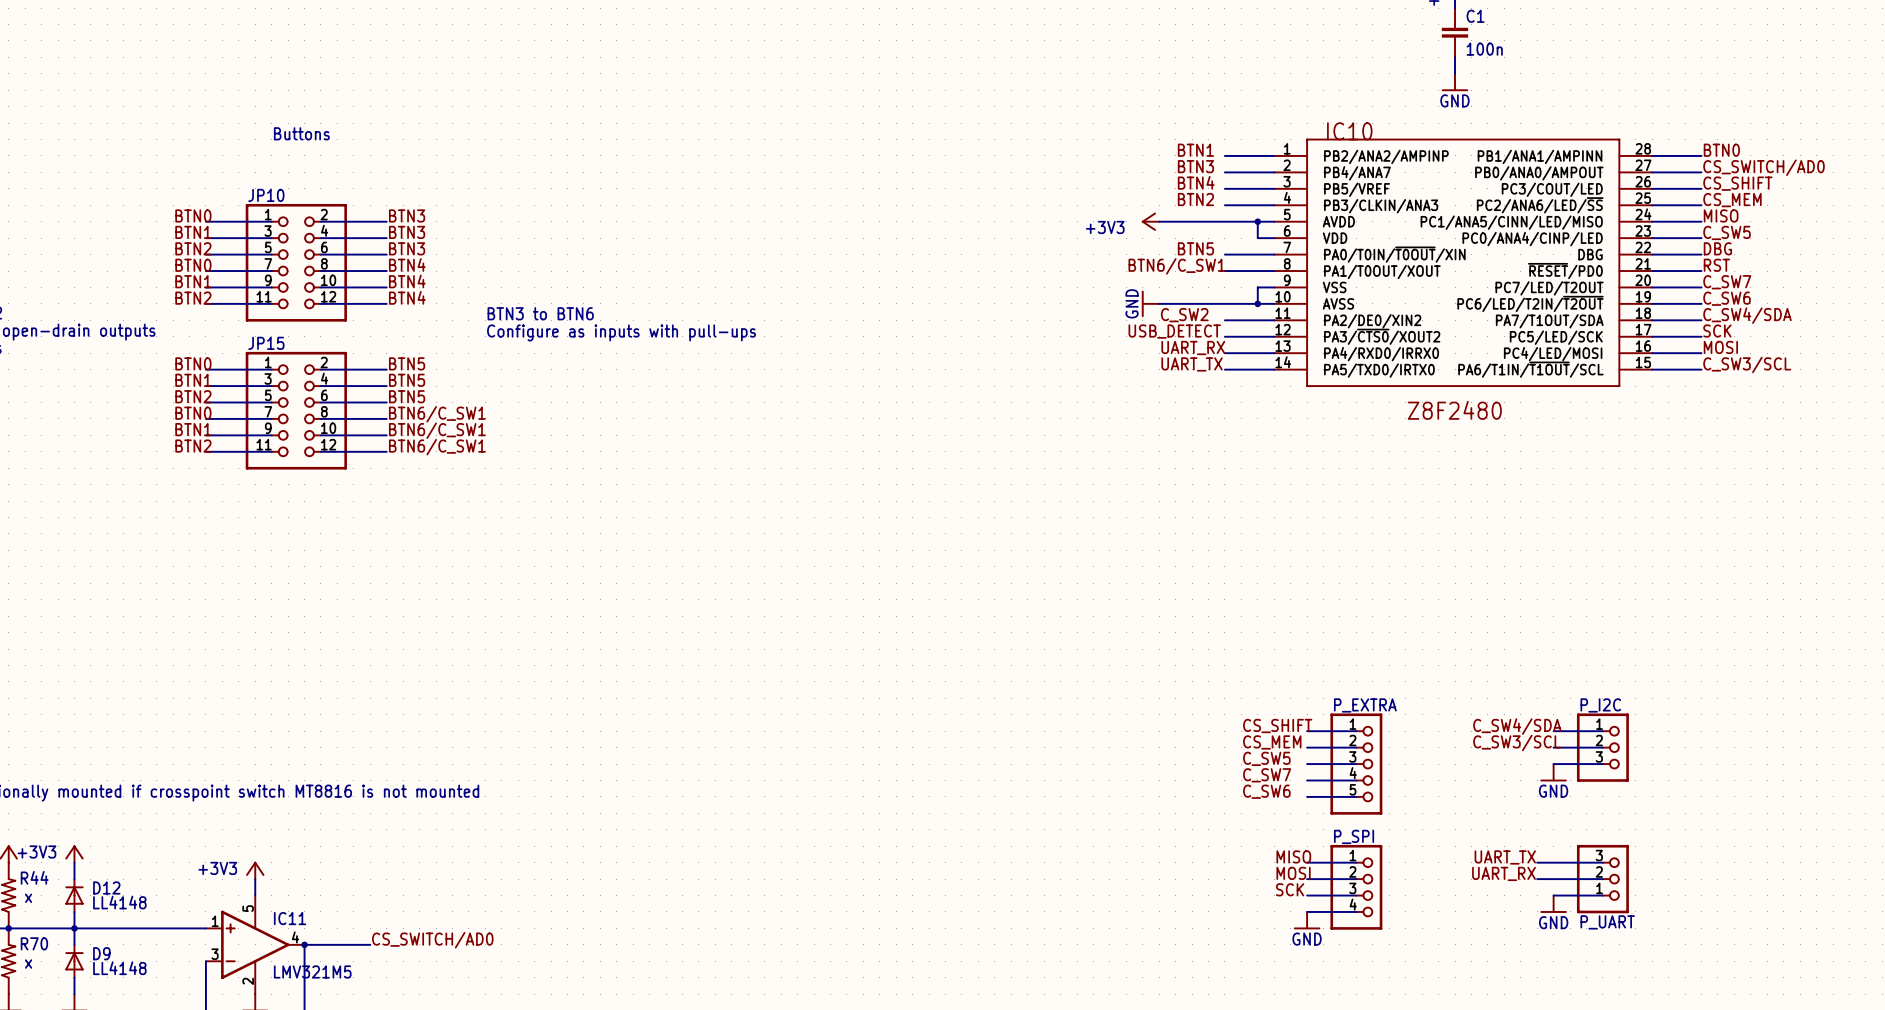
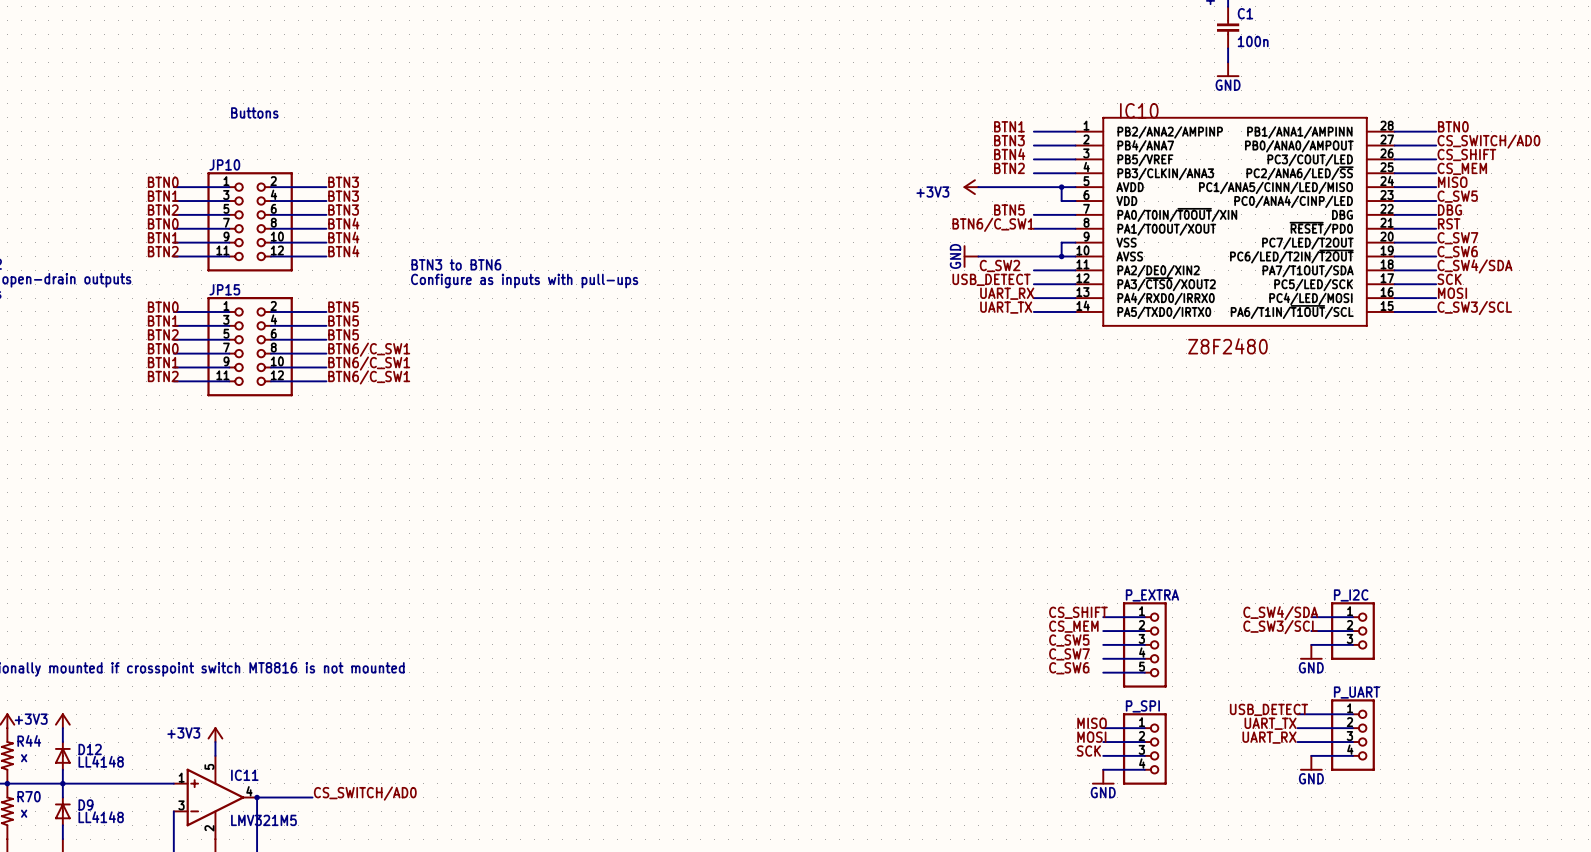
label: none -> USB_DETECT (1268, 709)
wire: none -> (1297, 714) (1352, 714)
P_UART: none -> (1352, 735)
P_UART: (1602, 879) -> none

